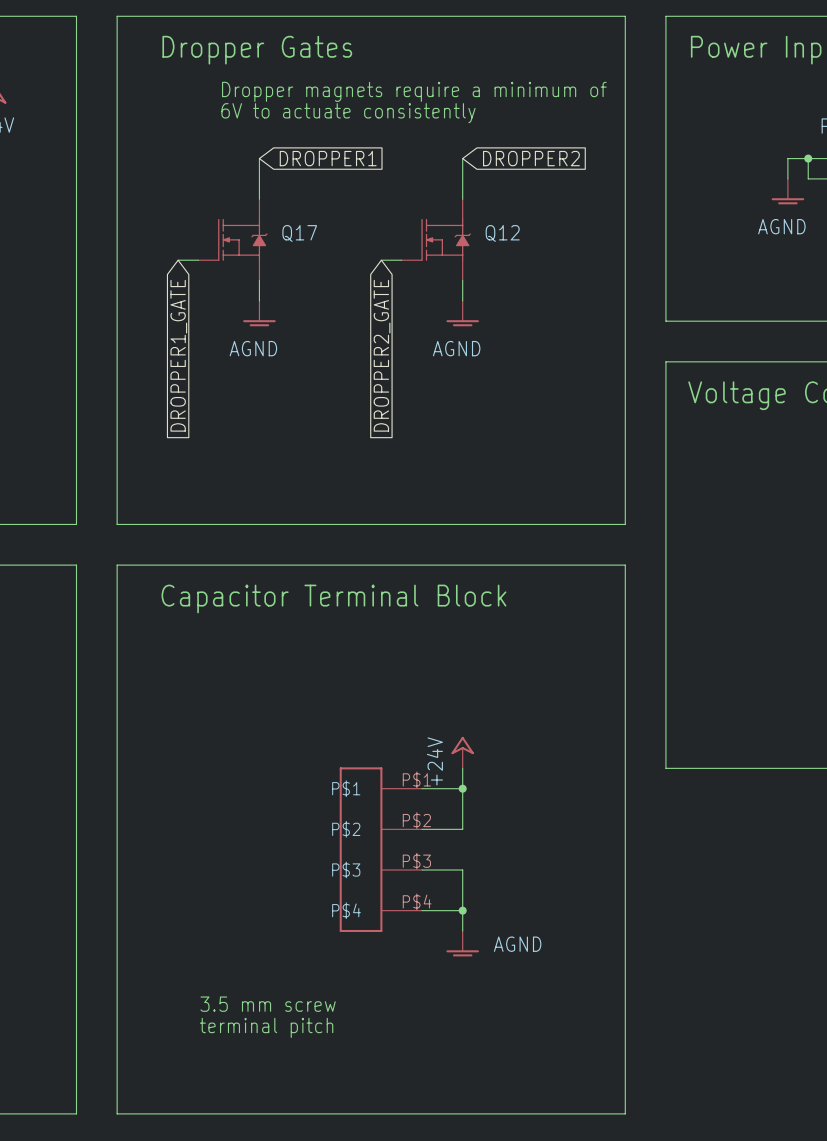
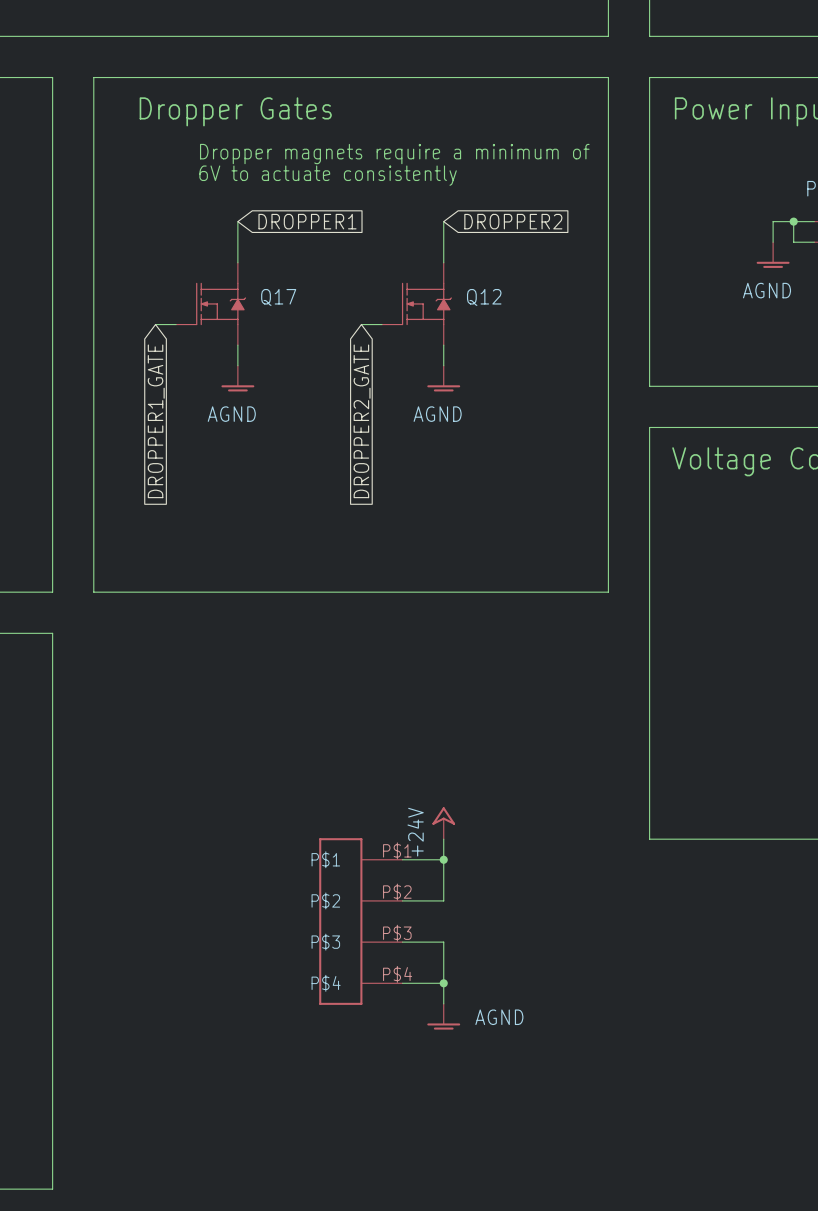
wire: (117, 565) (117, 1113) (625, 1113) (625, 565) (117, 565) -> none
text: Capacitor Terminal Block (333, 598) -> none
text: 3.5 mm screw (268, 1004) -> none
text: terminal pitch (266, 1027) -> none

